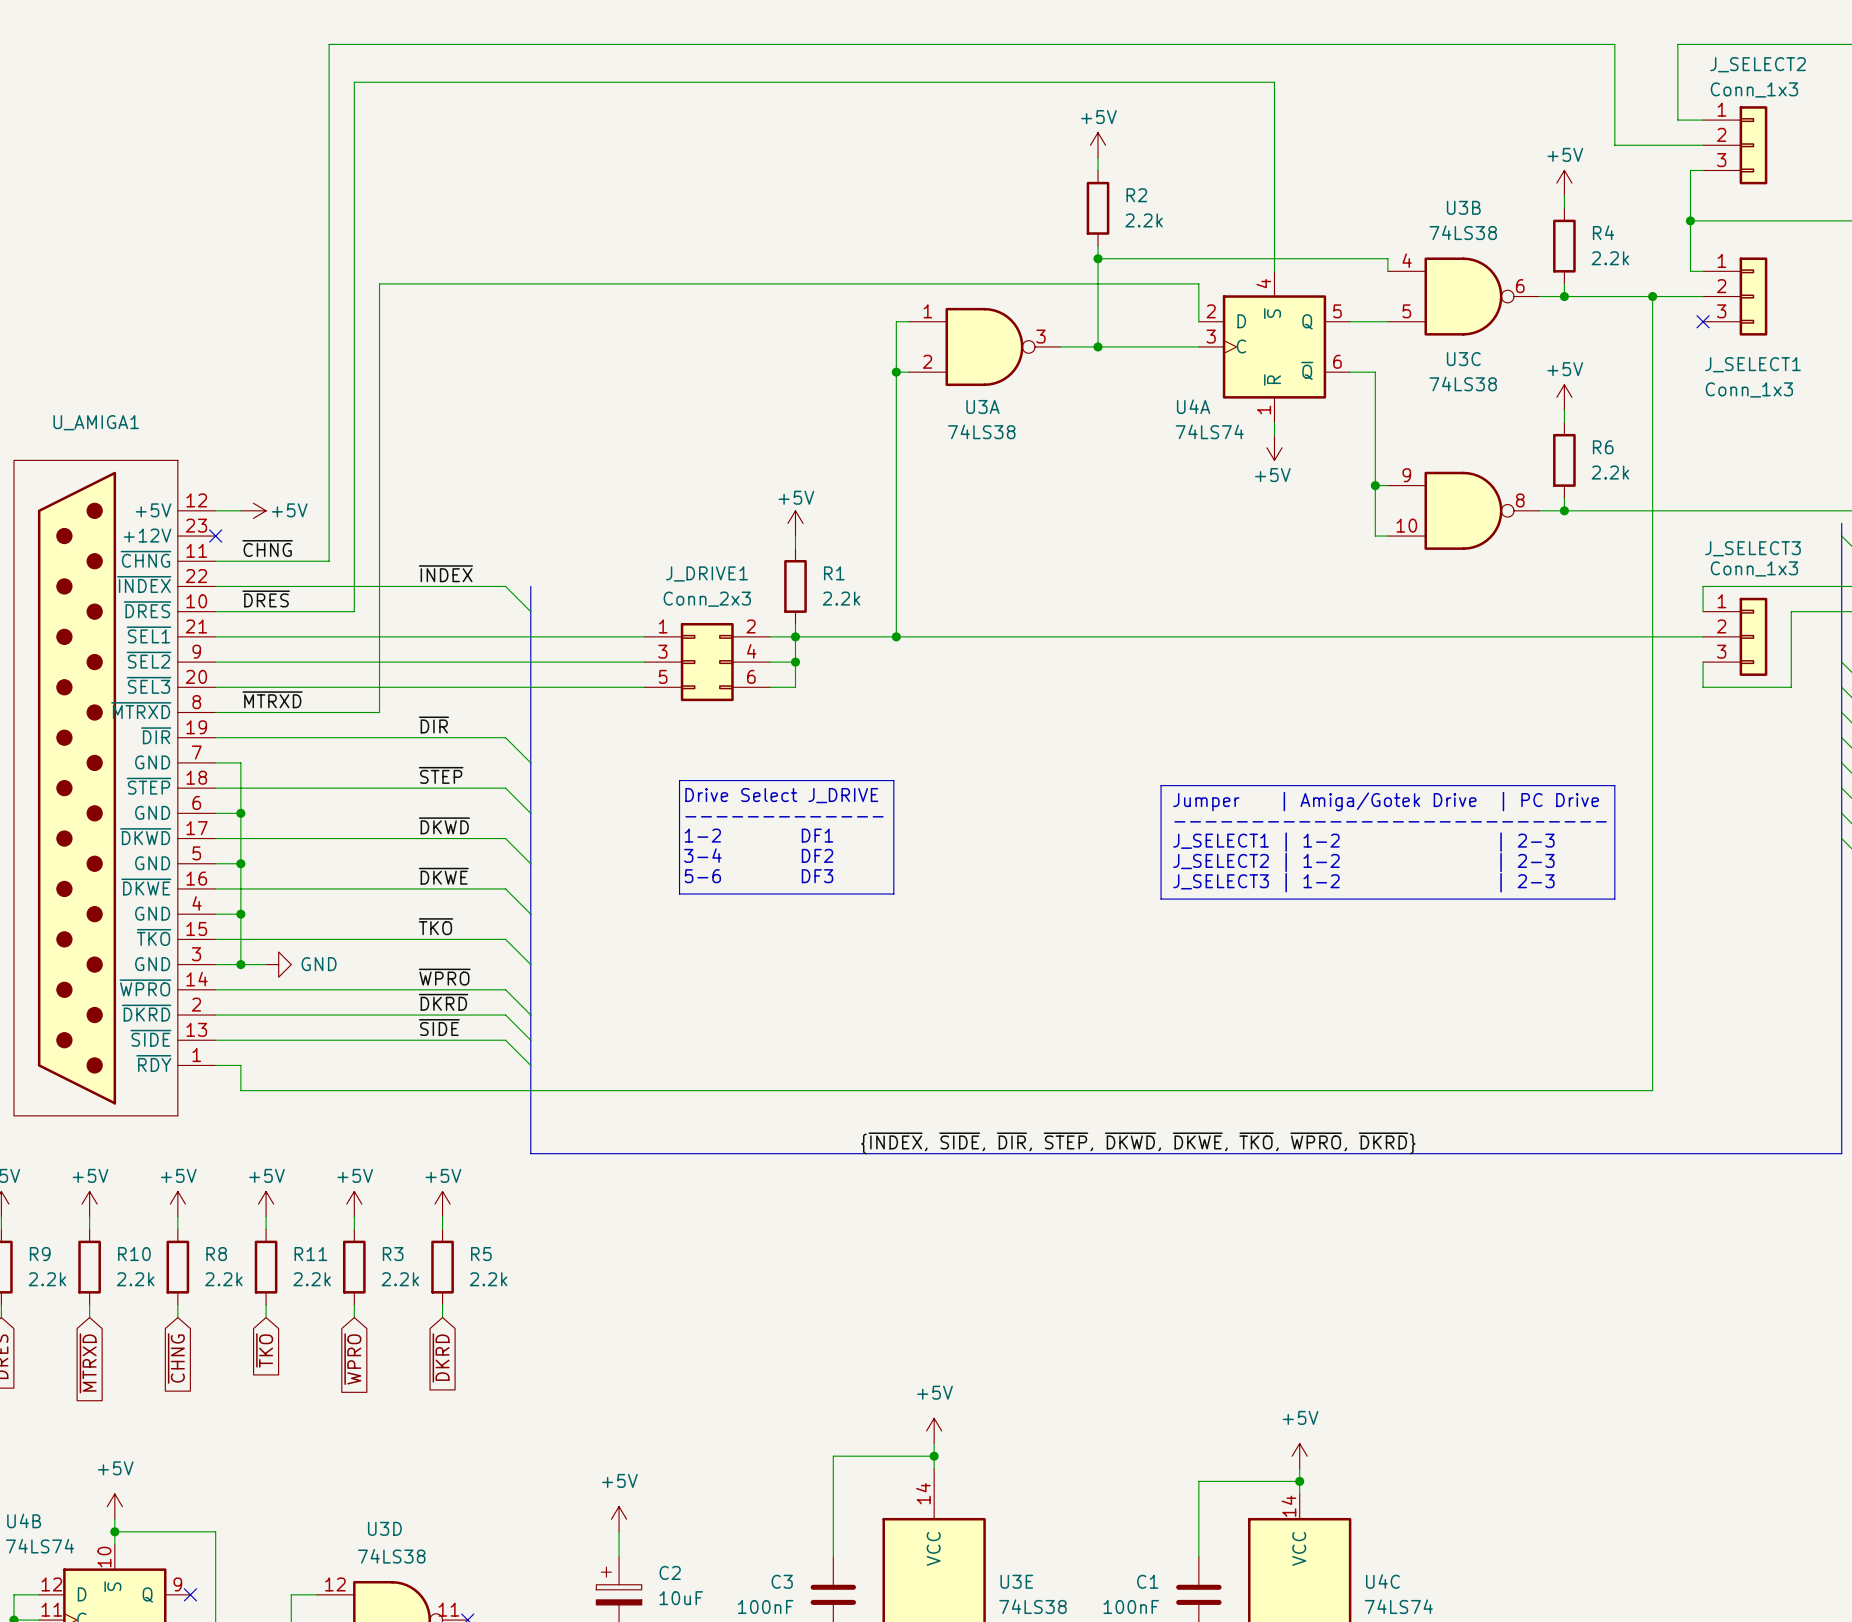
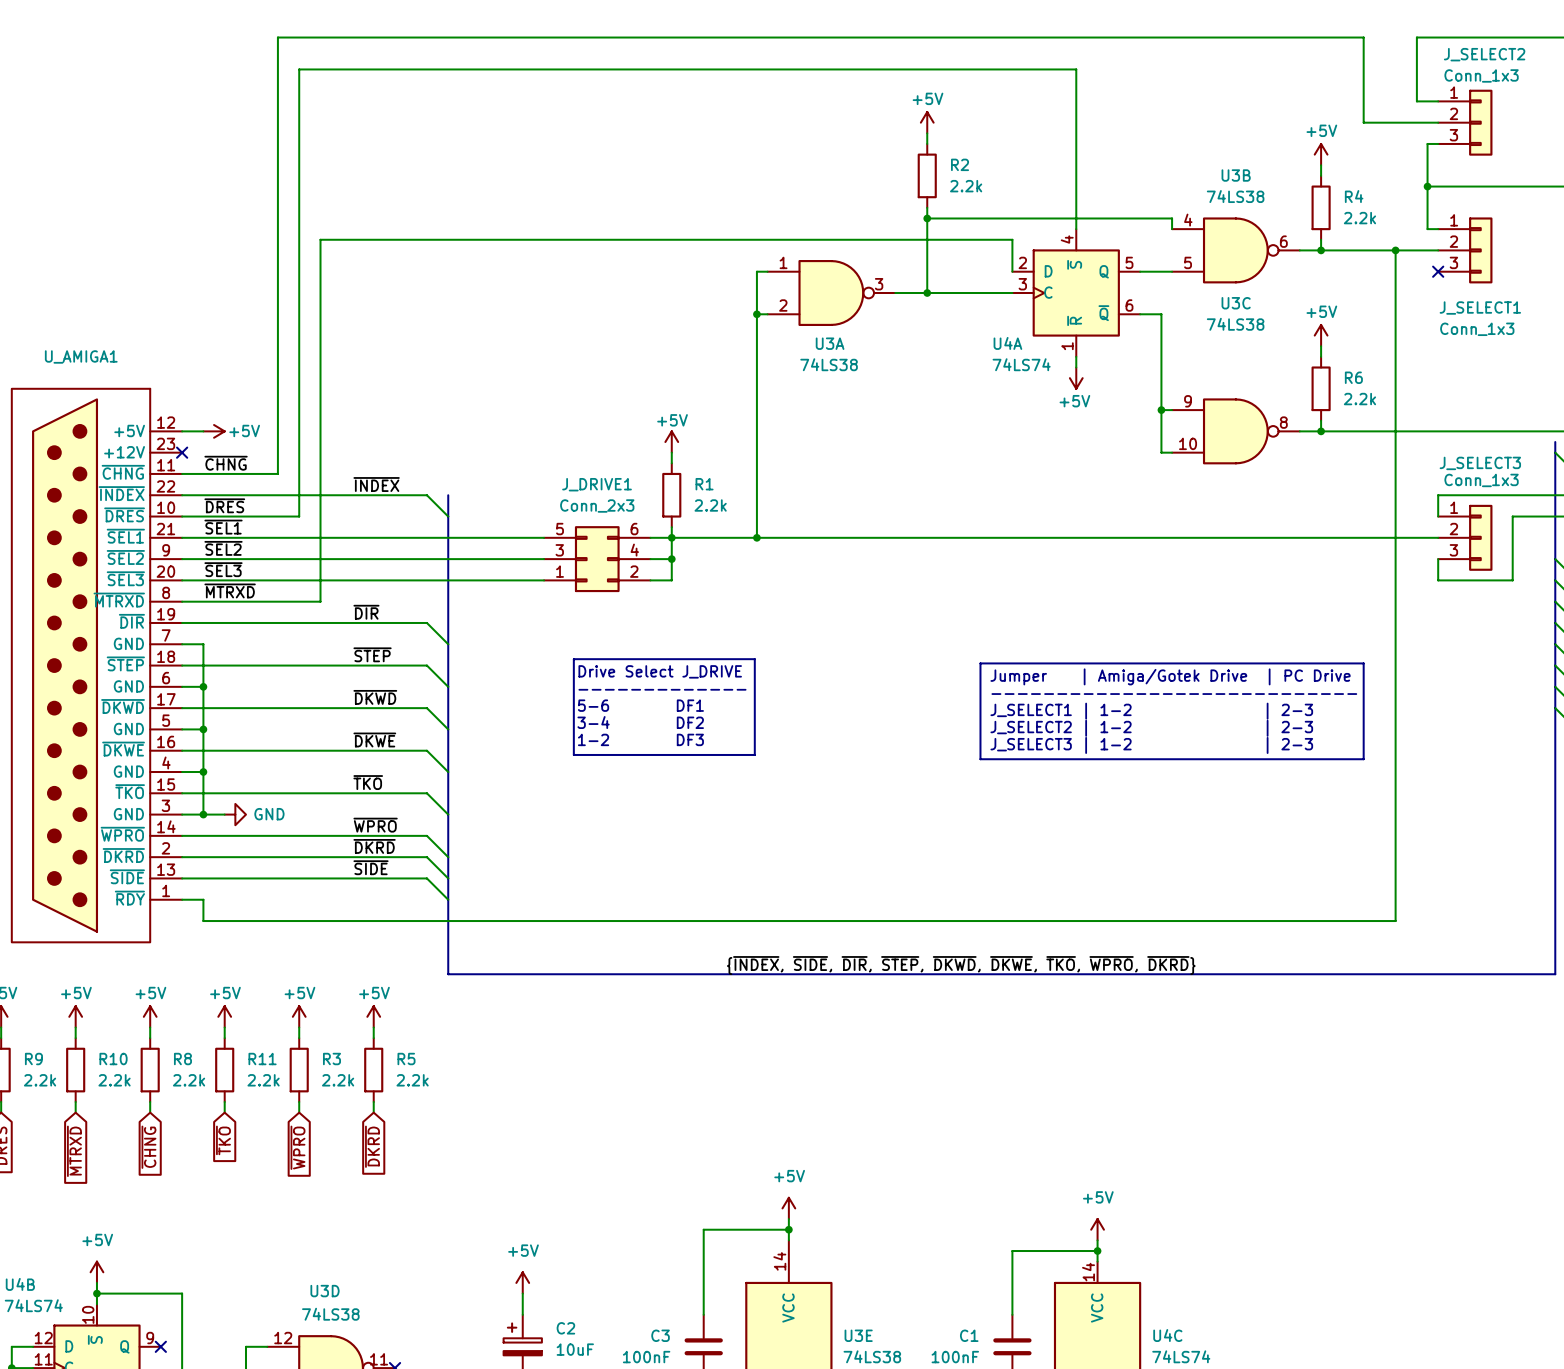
label: none -> ~{SEL1} (223, 527)
label: none -> ~{SEL2} (223, 548)
J_DRIVE1 flip: as is (707, 662) -> up-down (597, 559)
label: none -> ~{SEL3} (223, 569)
text: 1-2 DF1 (758, 835) -> 5-6 DF1 (640, 705)
text: 5-6 DF3 (758, 876) -> 1-2 DF3 (640, 739)

